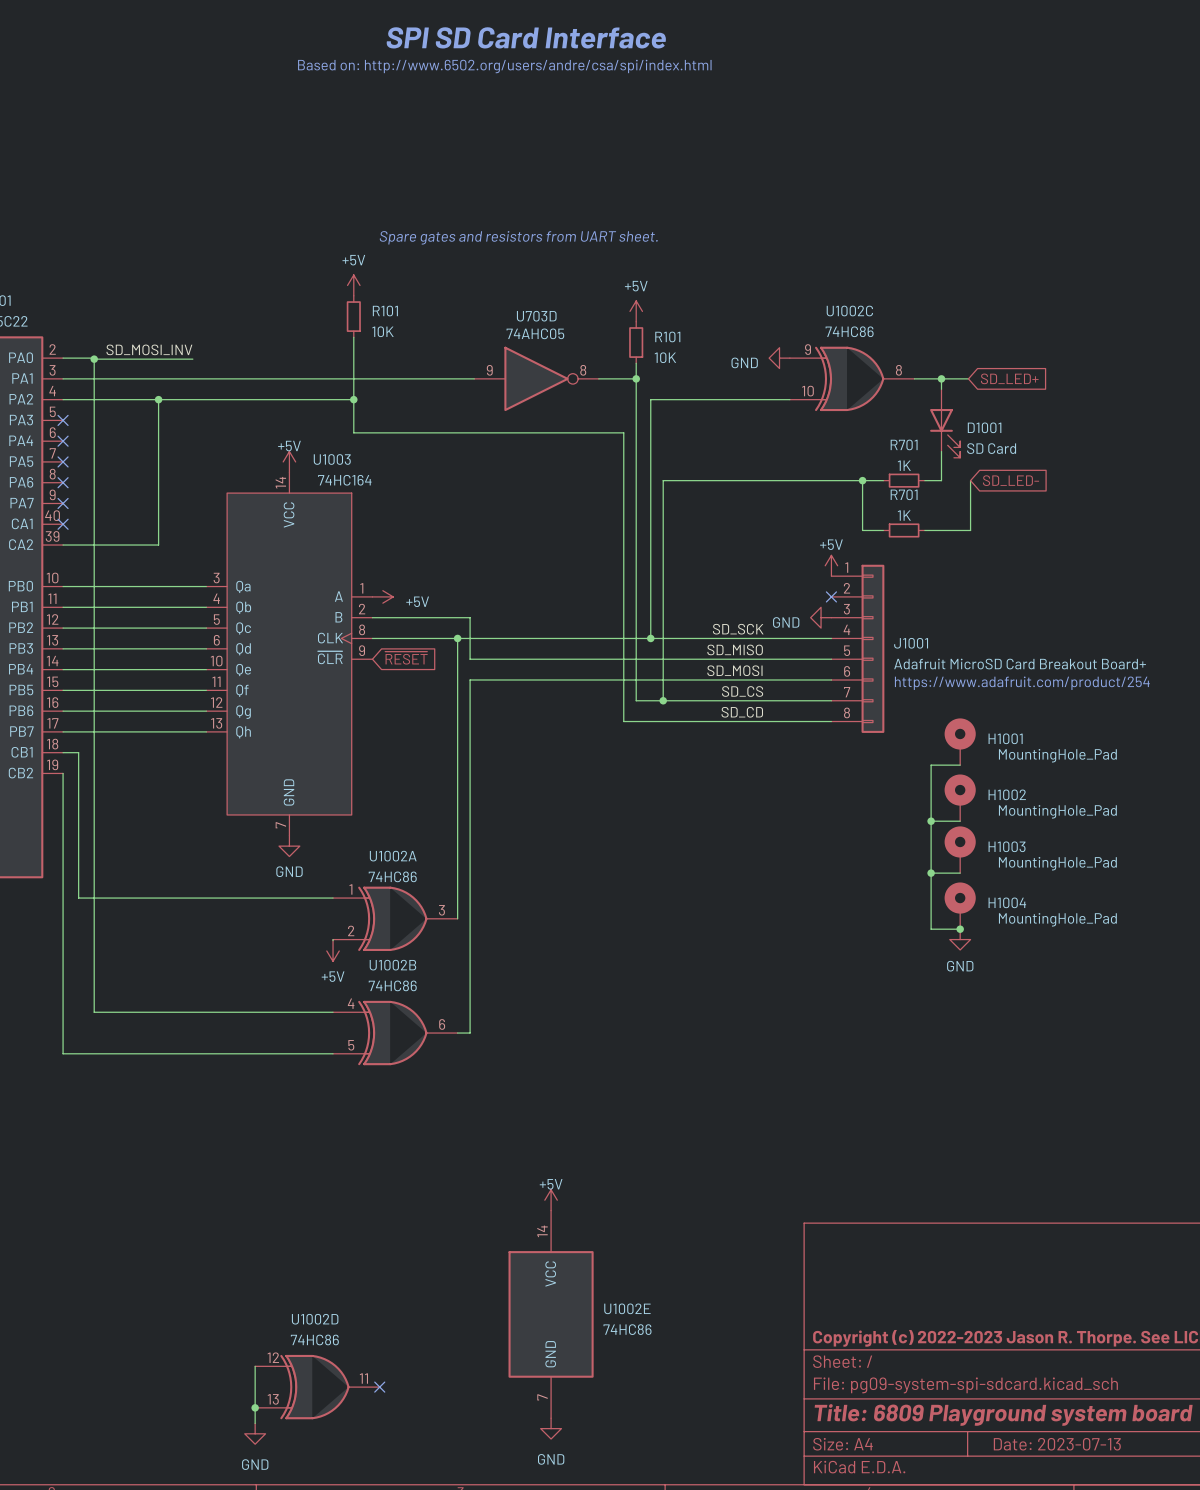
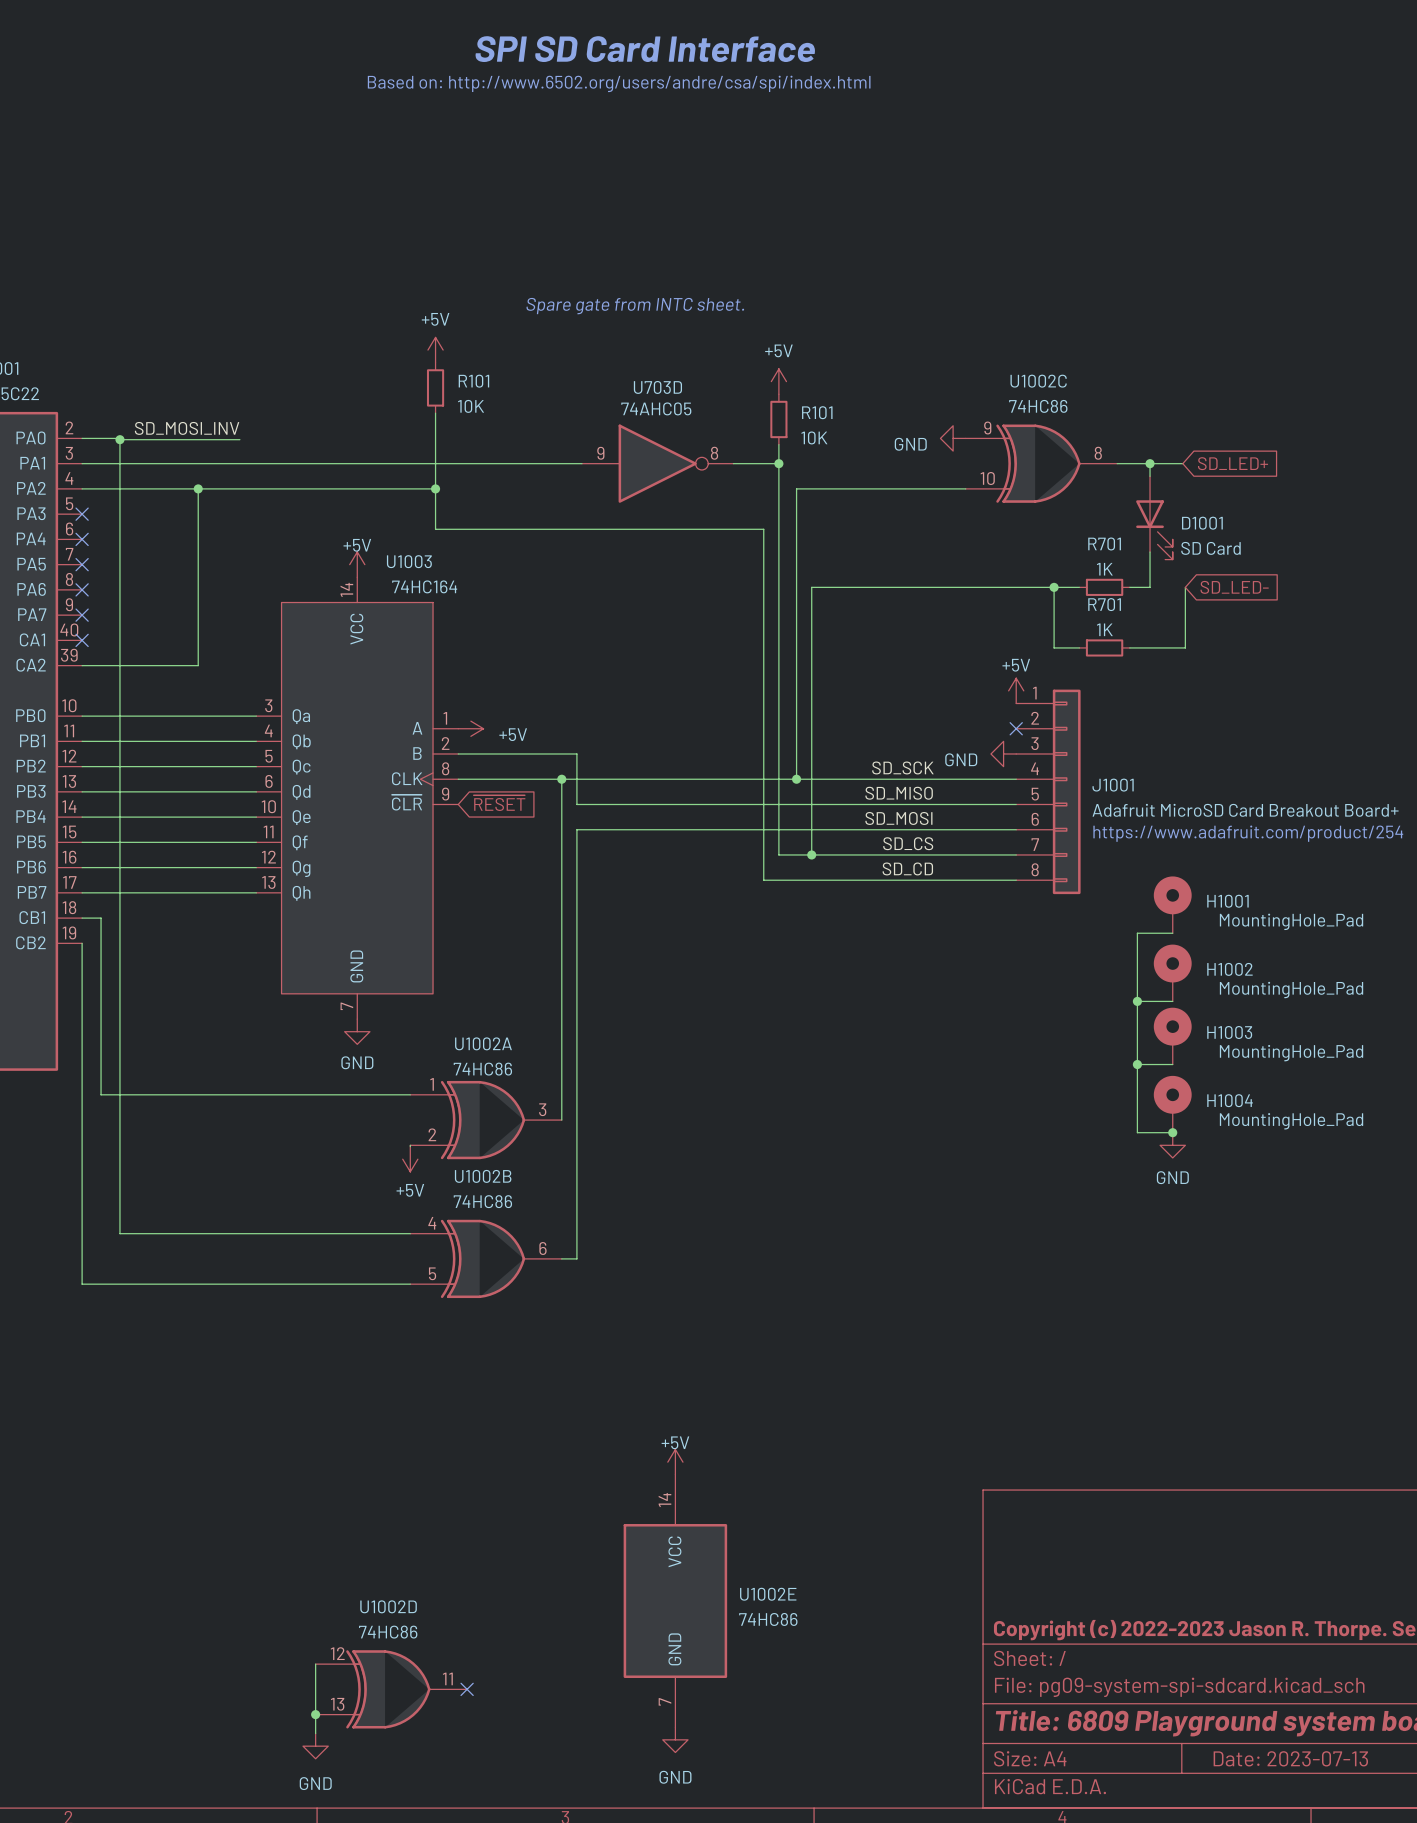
text: Spare gates and resistors from UART sheet. (518, 237) -> Spare gate from INTC sheet. (635, 306)

